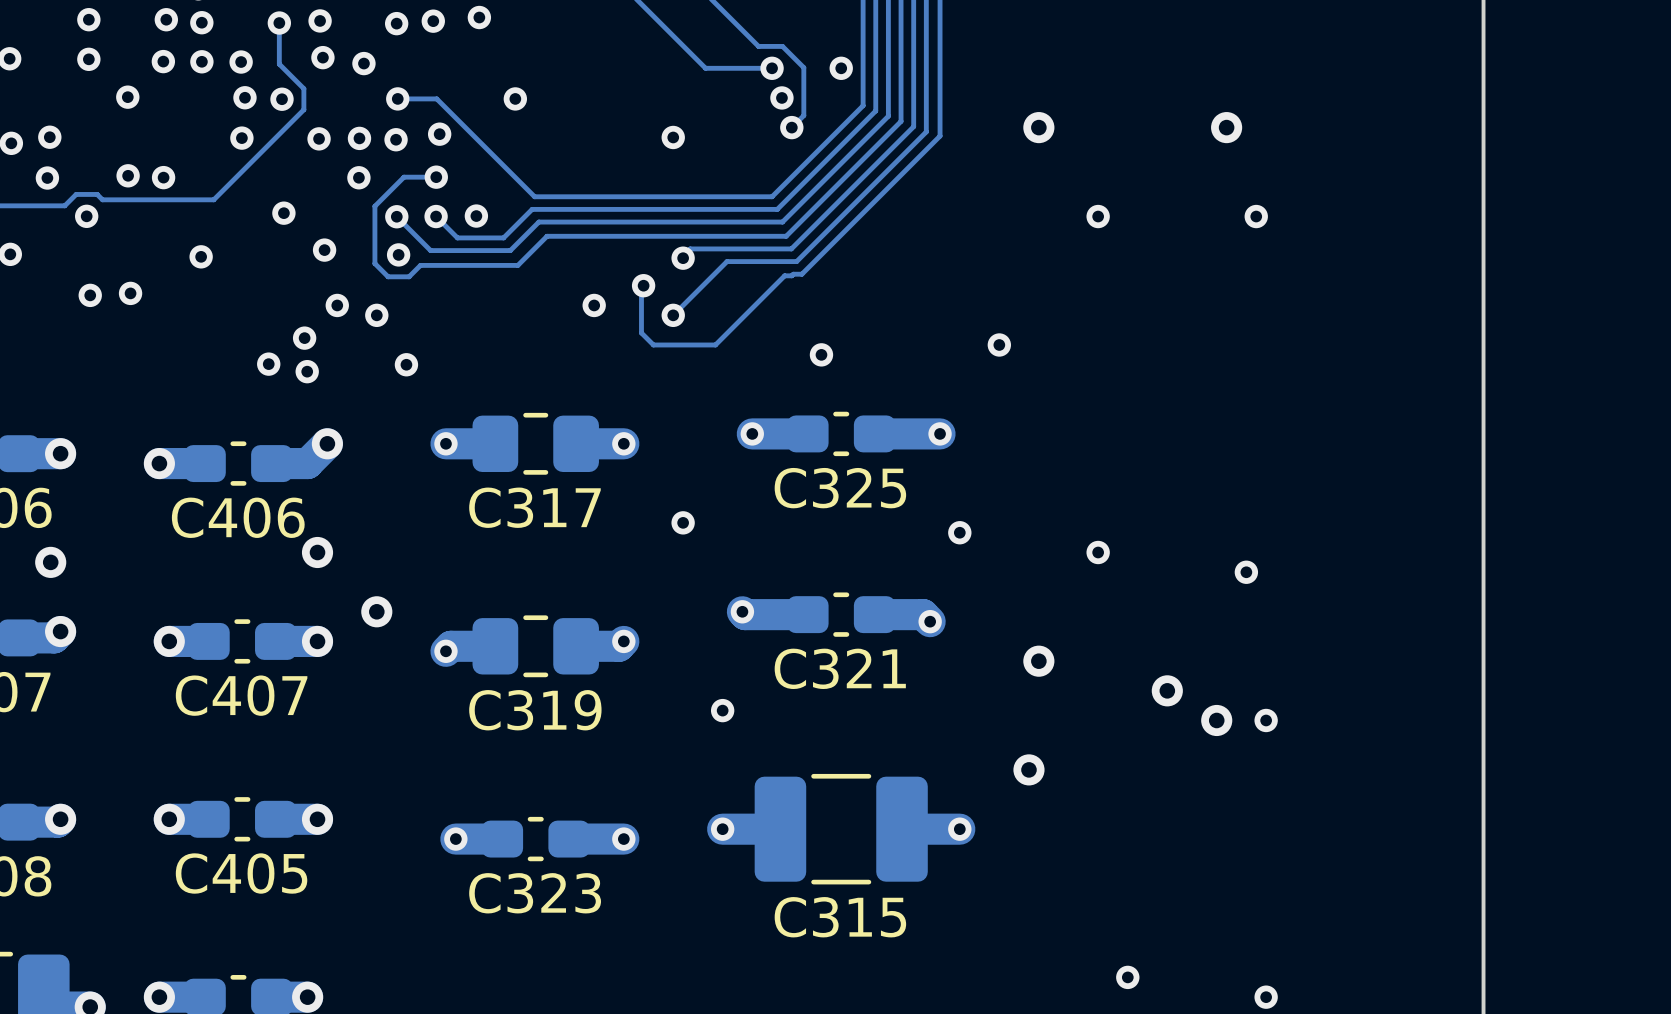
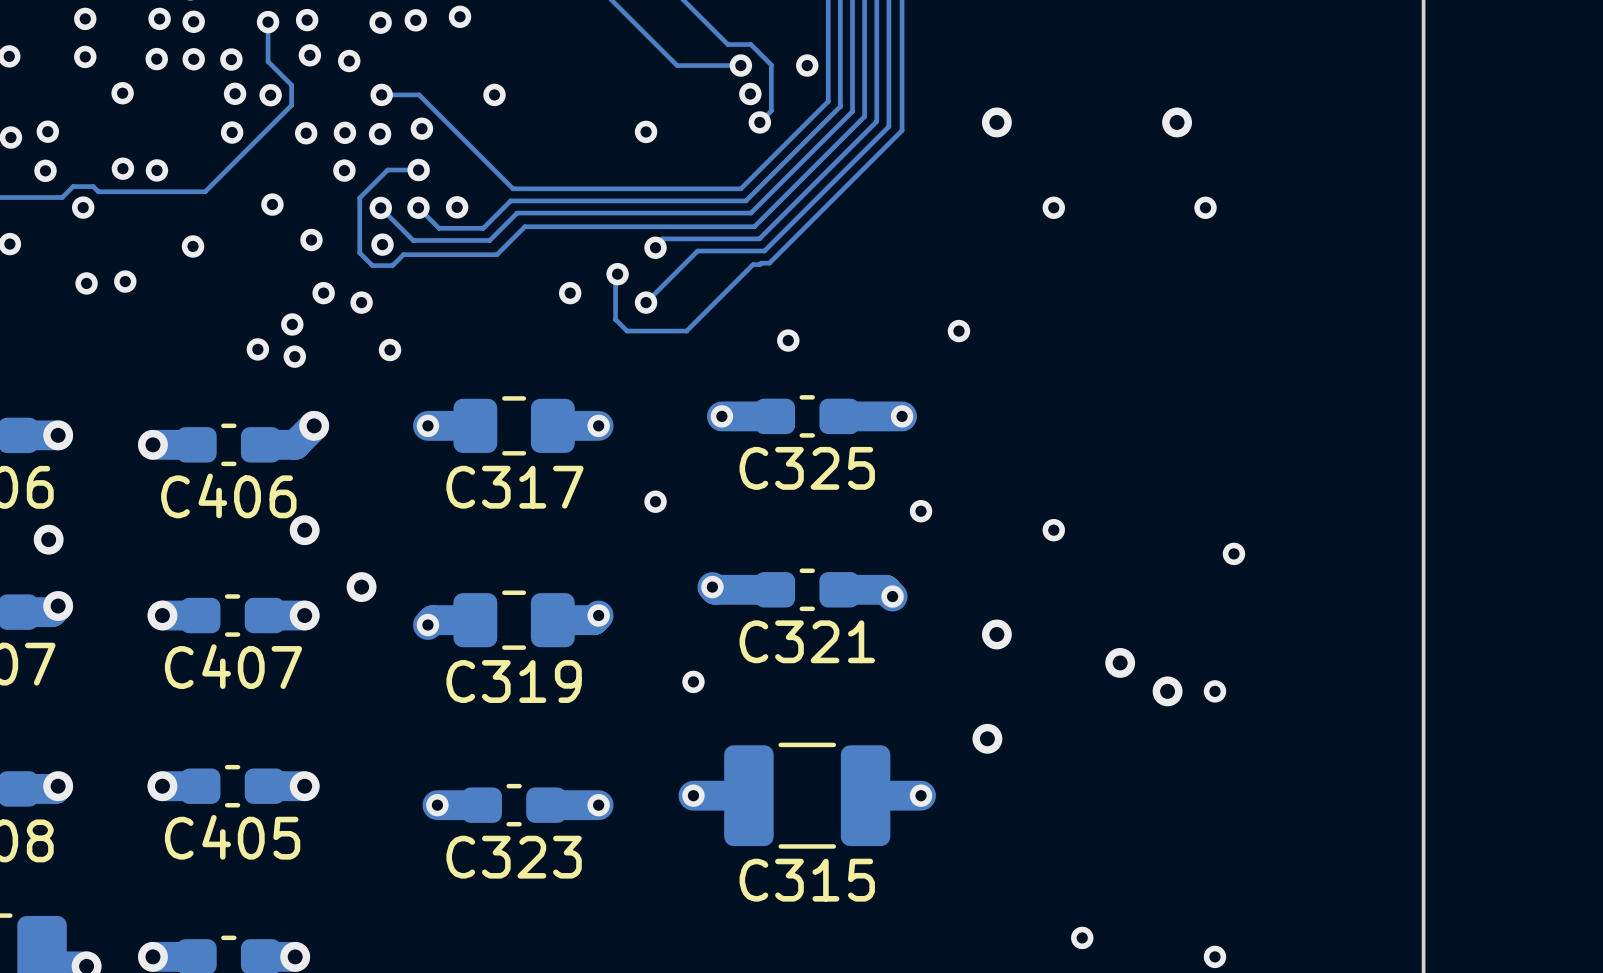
via position: (1246, 572) -> (1233, 553)

